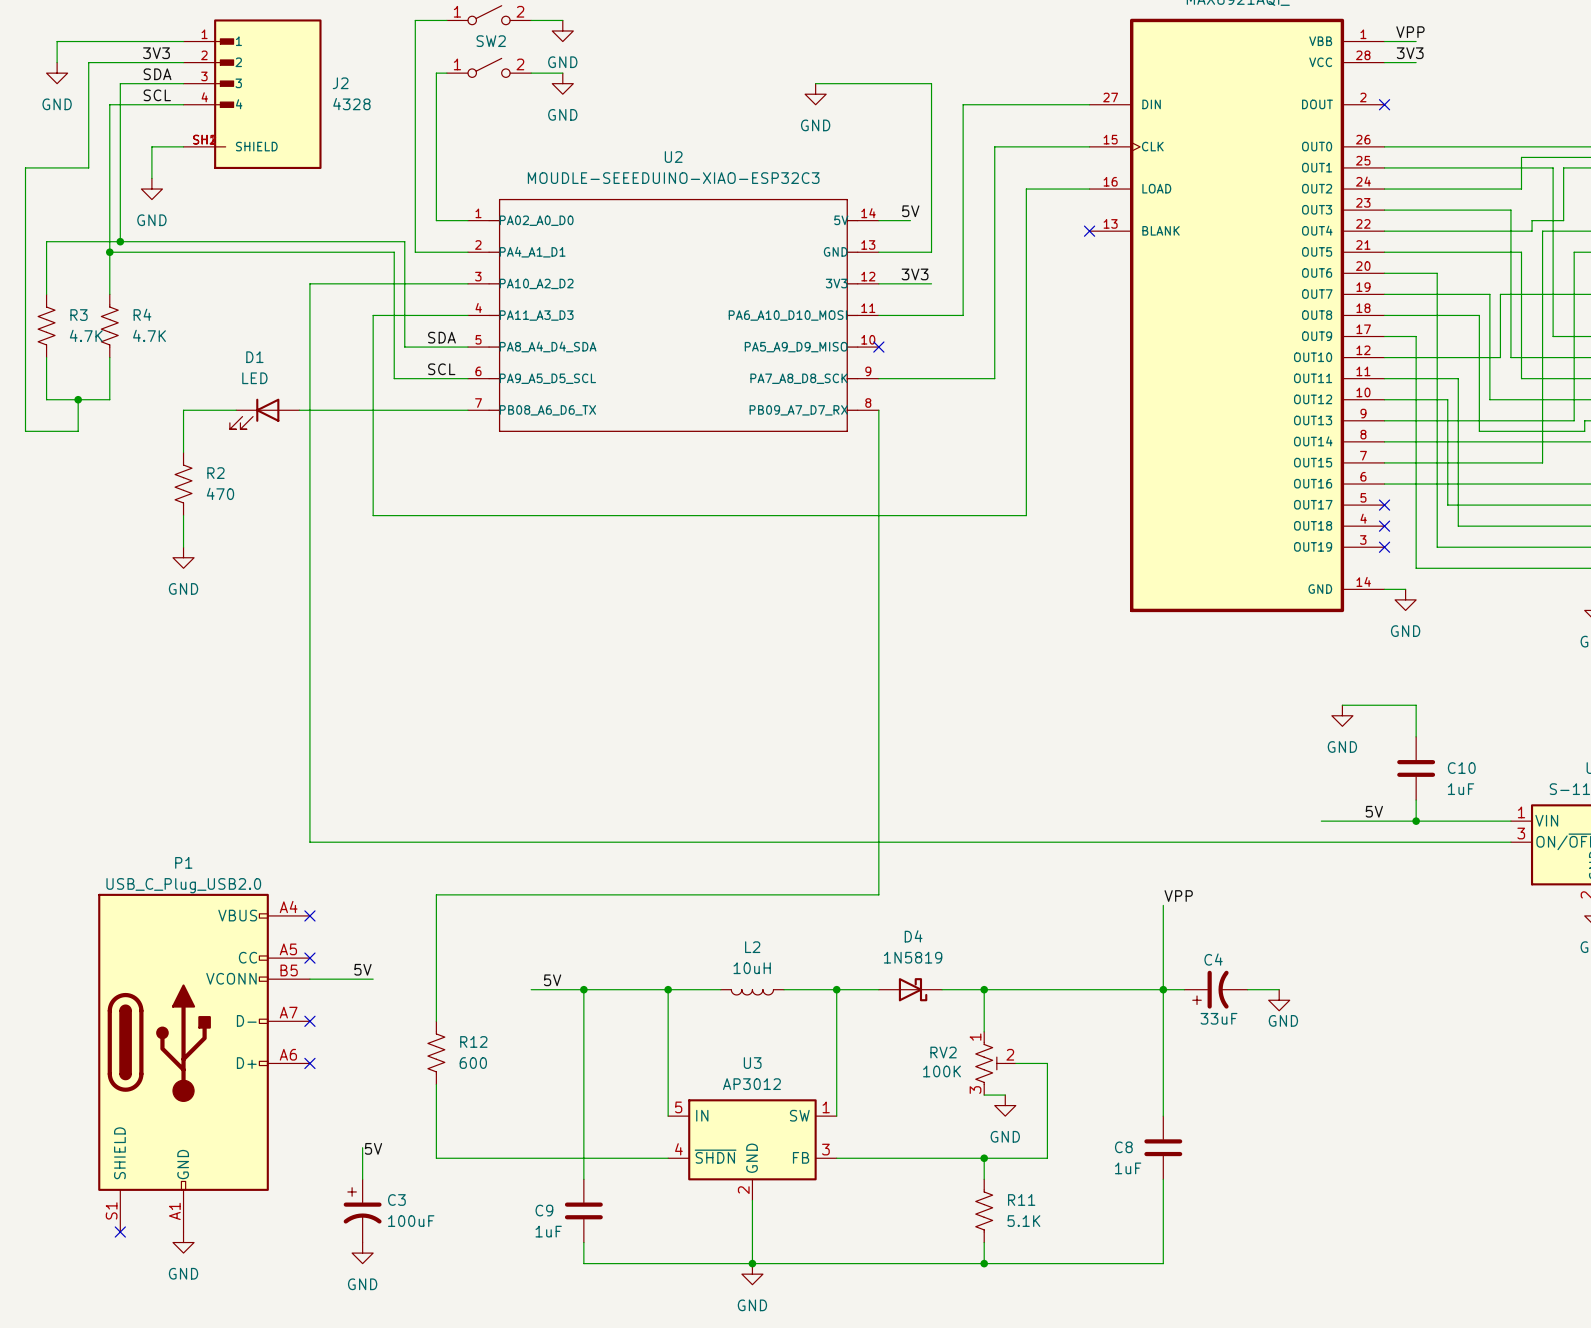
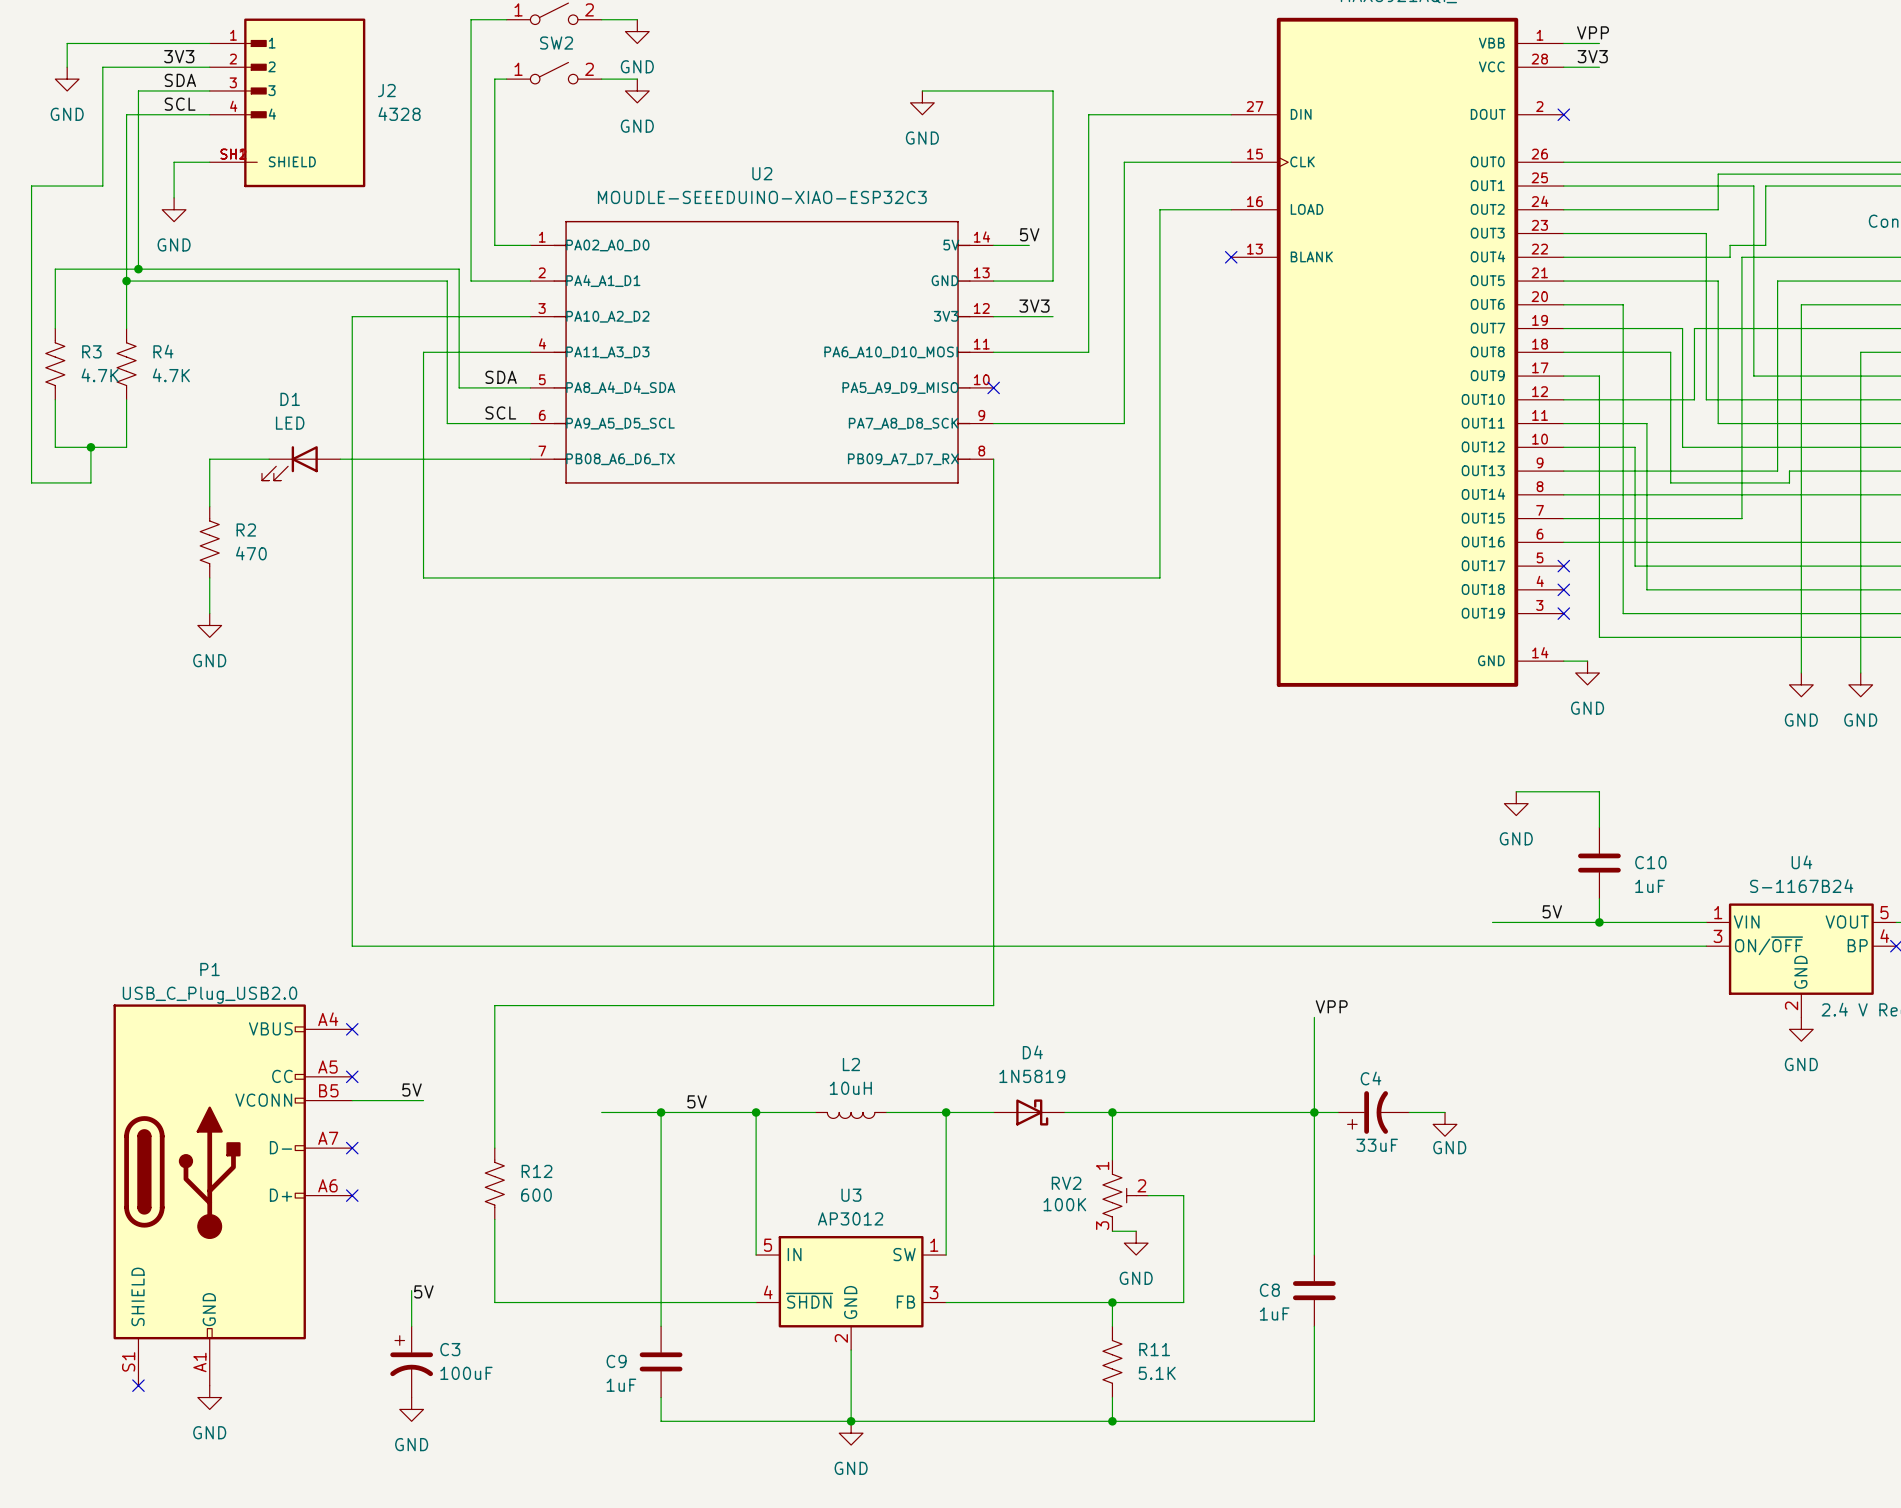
label position: 5V (552, 980) -> 5V (697, 1101)

